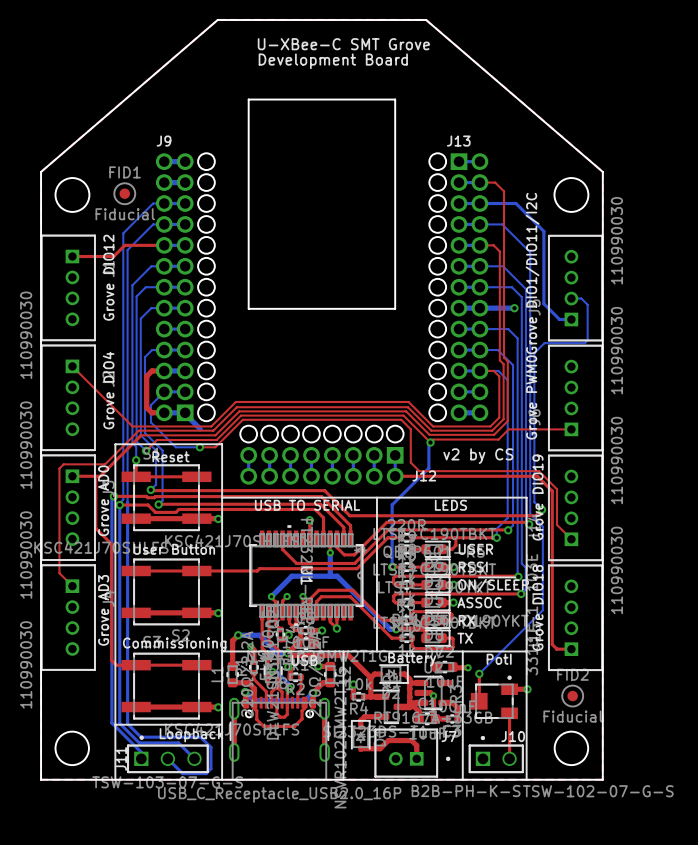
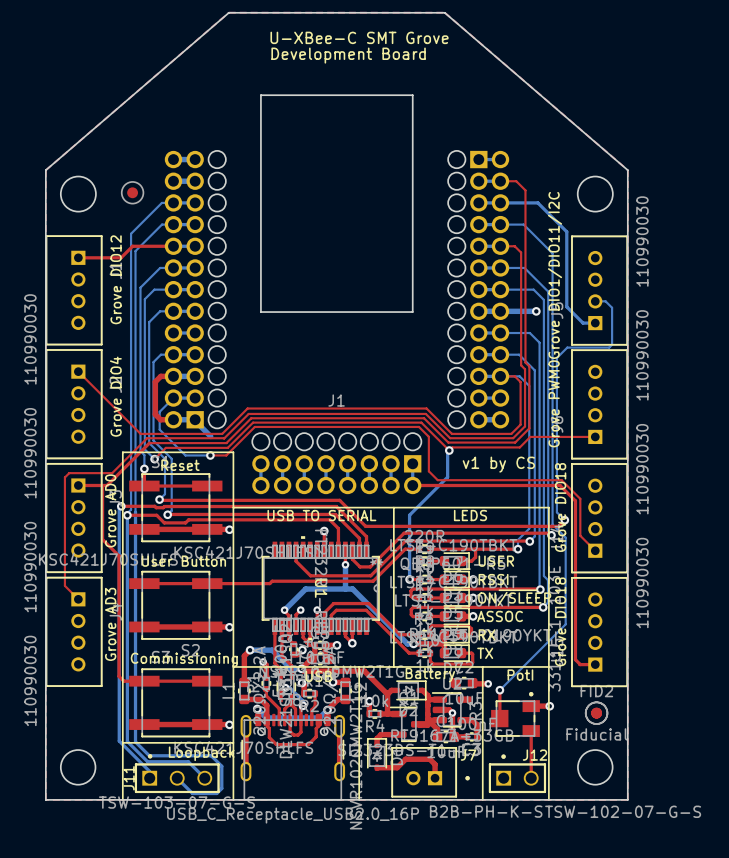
FID1: Fiducial (124, 193) -> none
J9: (185, 287) -> none
J13: (458, 287) -> none
J1: none -> (336, 406)
J12: (321, 455) -> none
text: v2 by CS (478, 456) -> v1 by CS (498, 464)
text: Grove DIO19 (537, 497) -> Grove DIO18 (560, 507)
J10 name: J10 (513, 736) -> J12 (534, 755)

